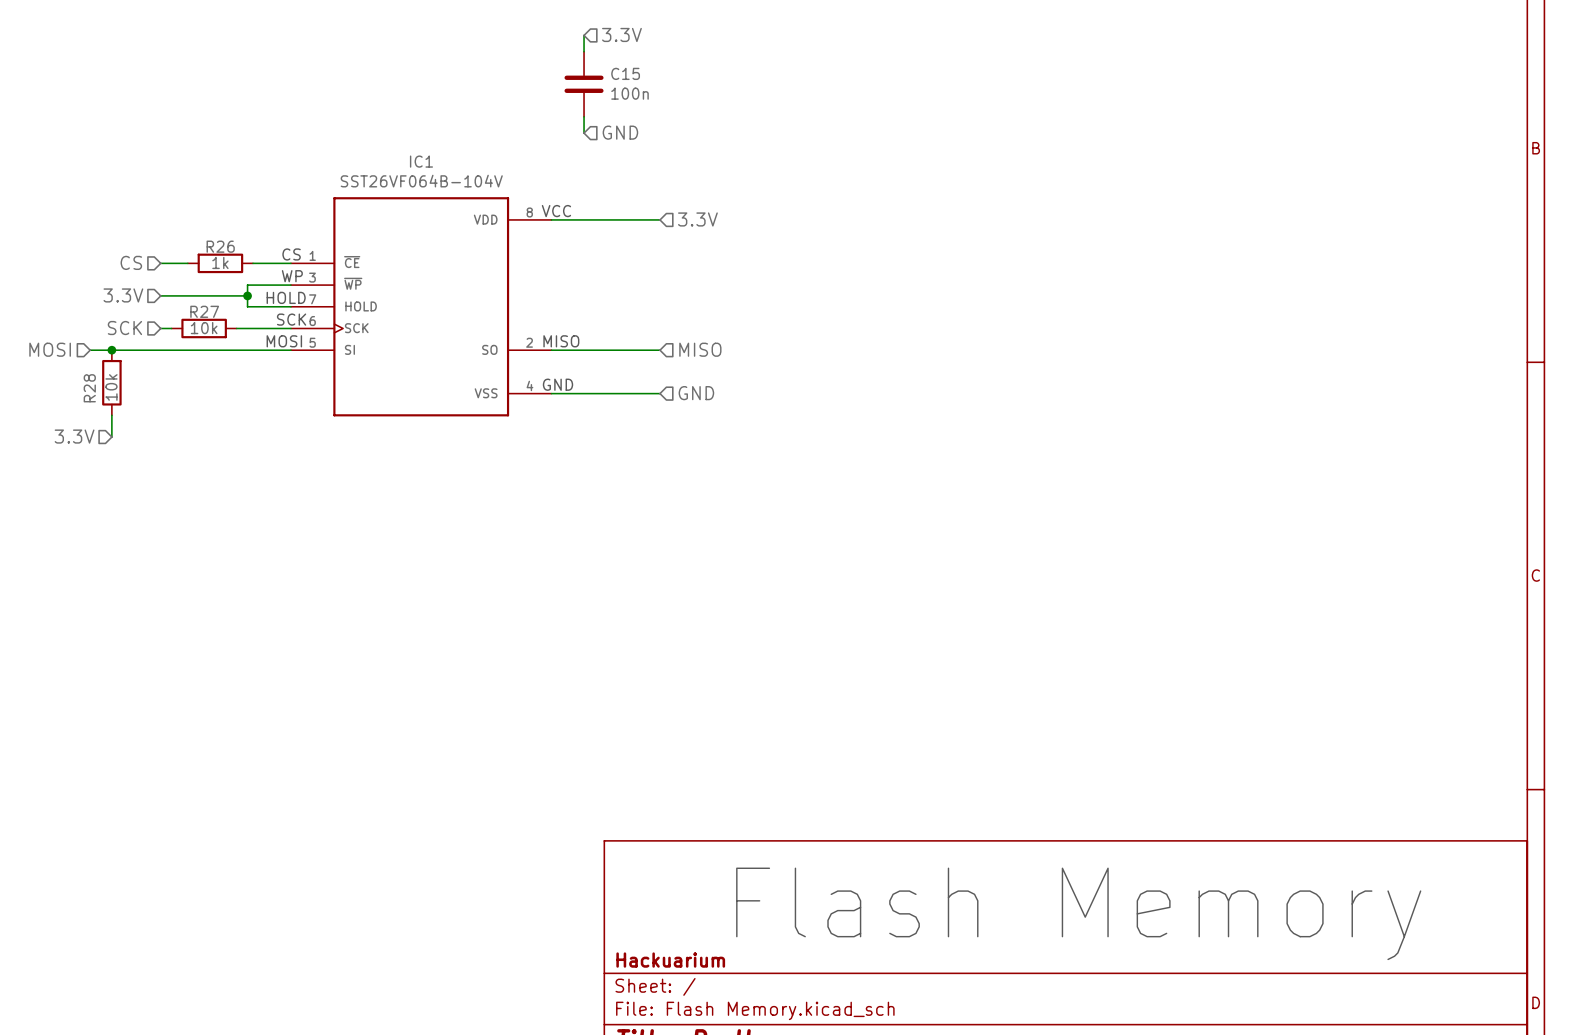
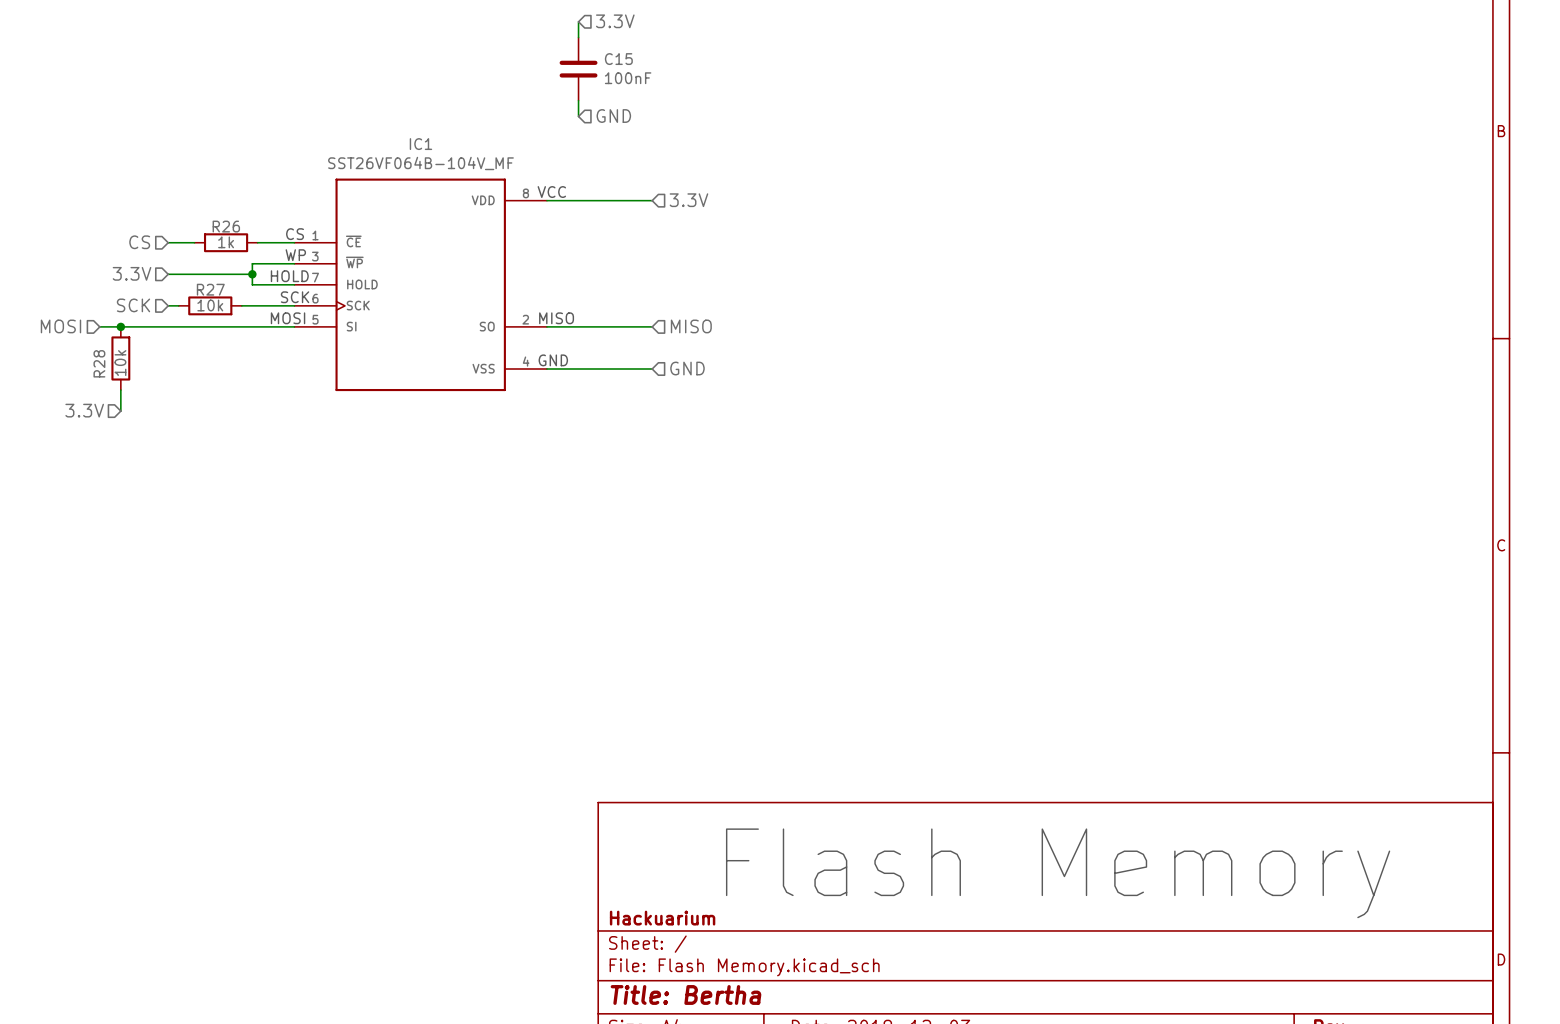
C15 value: 100n (630, 93) -> 100nF (628, 78)
IC1 value: SST26VF064B-104V (421, 181) -> SST26VF064B-104V_MF (420, 163)

